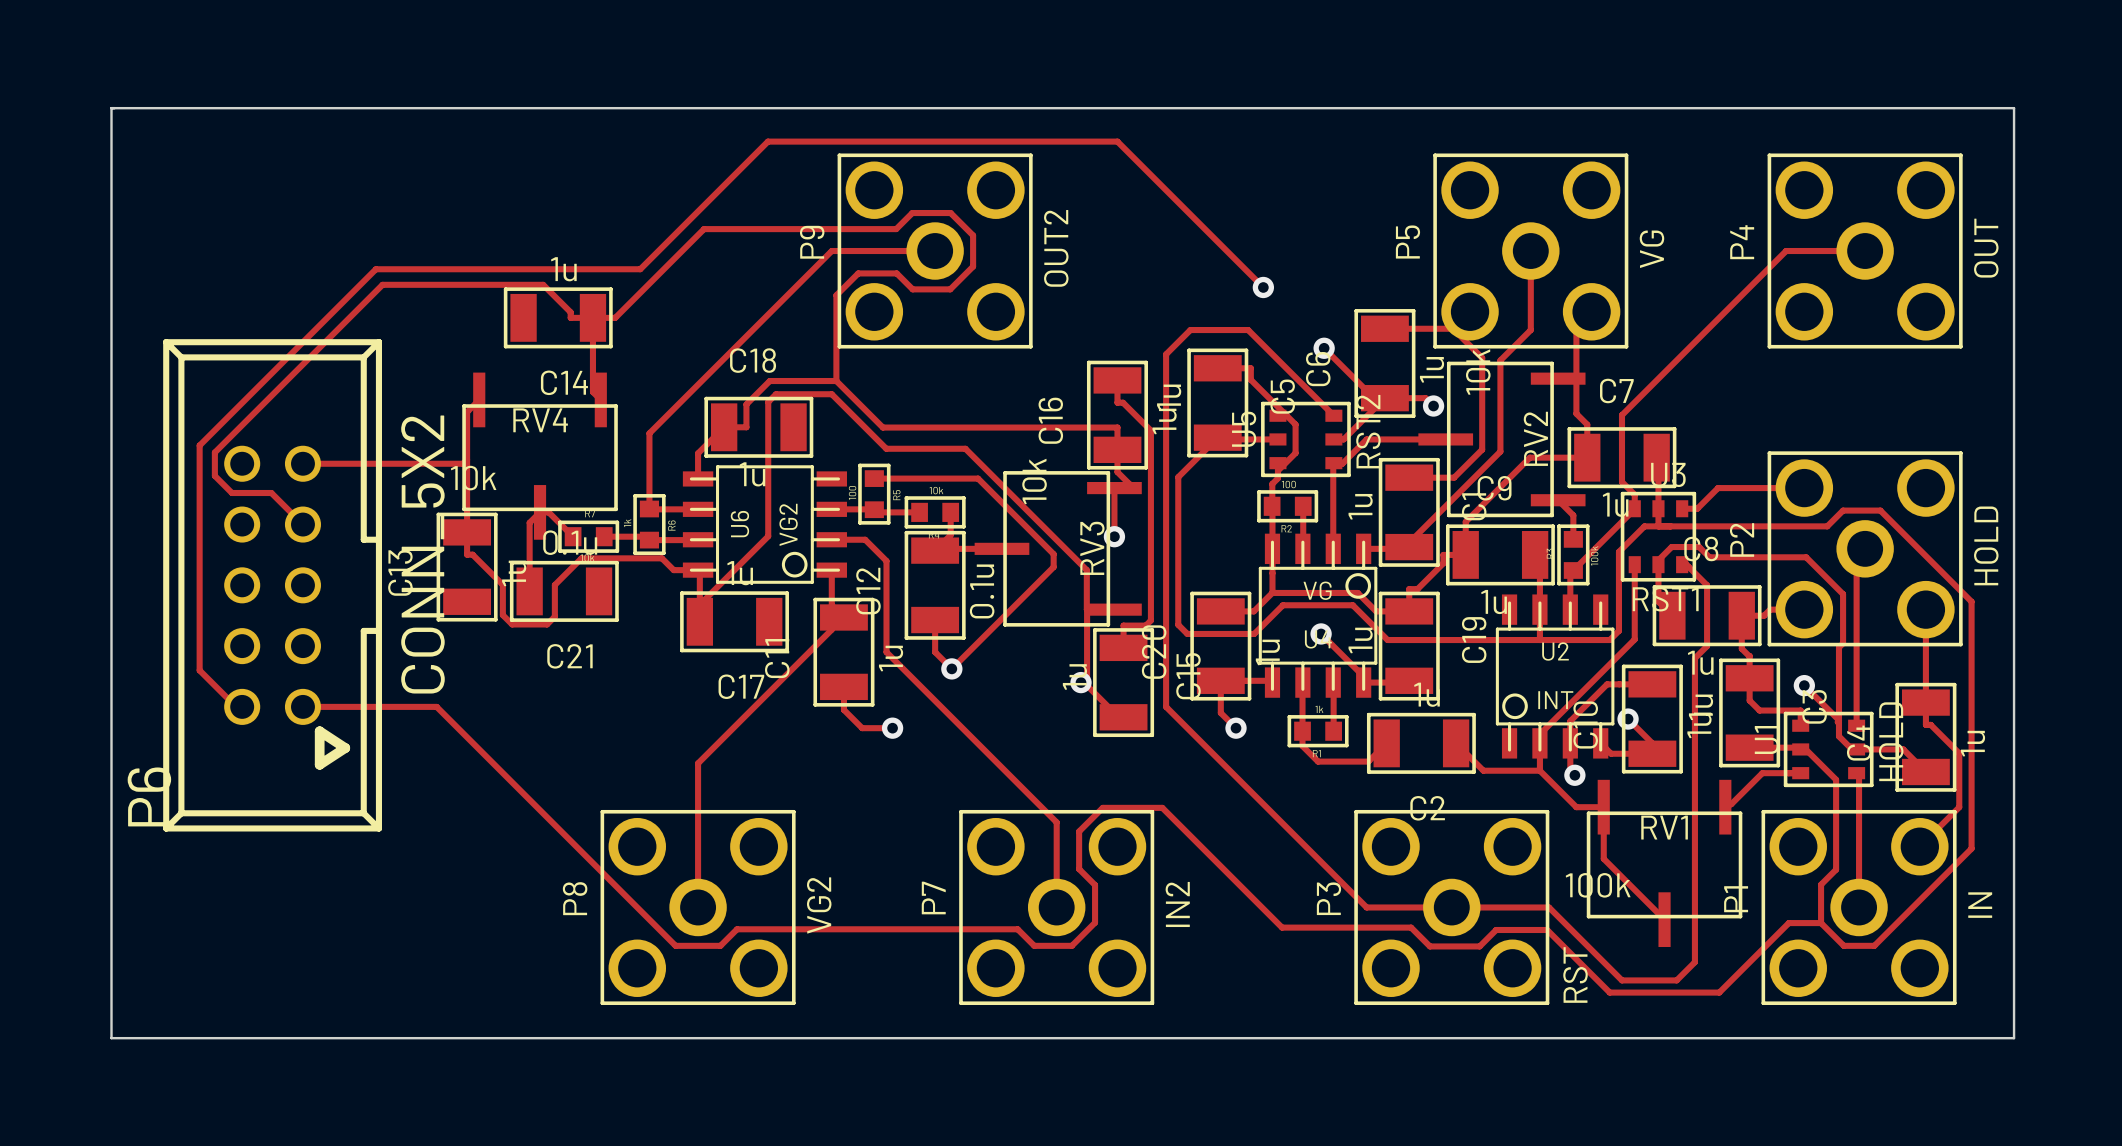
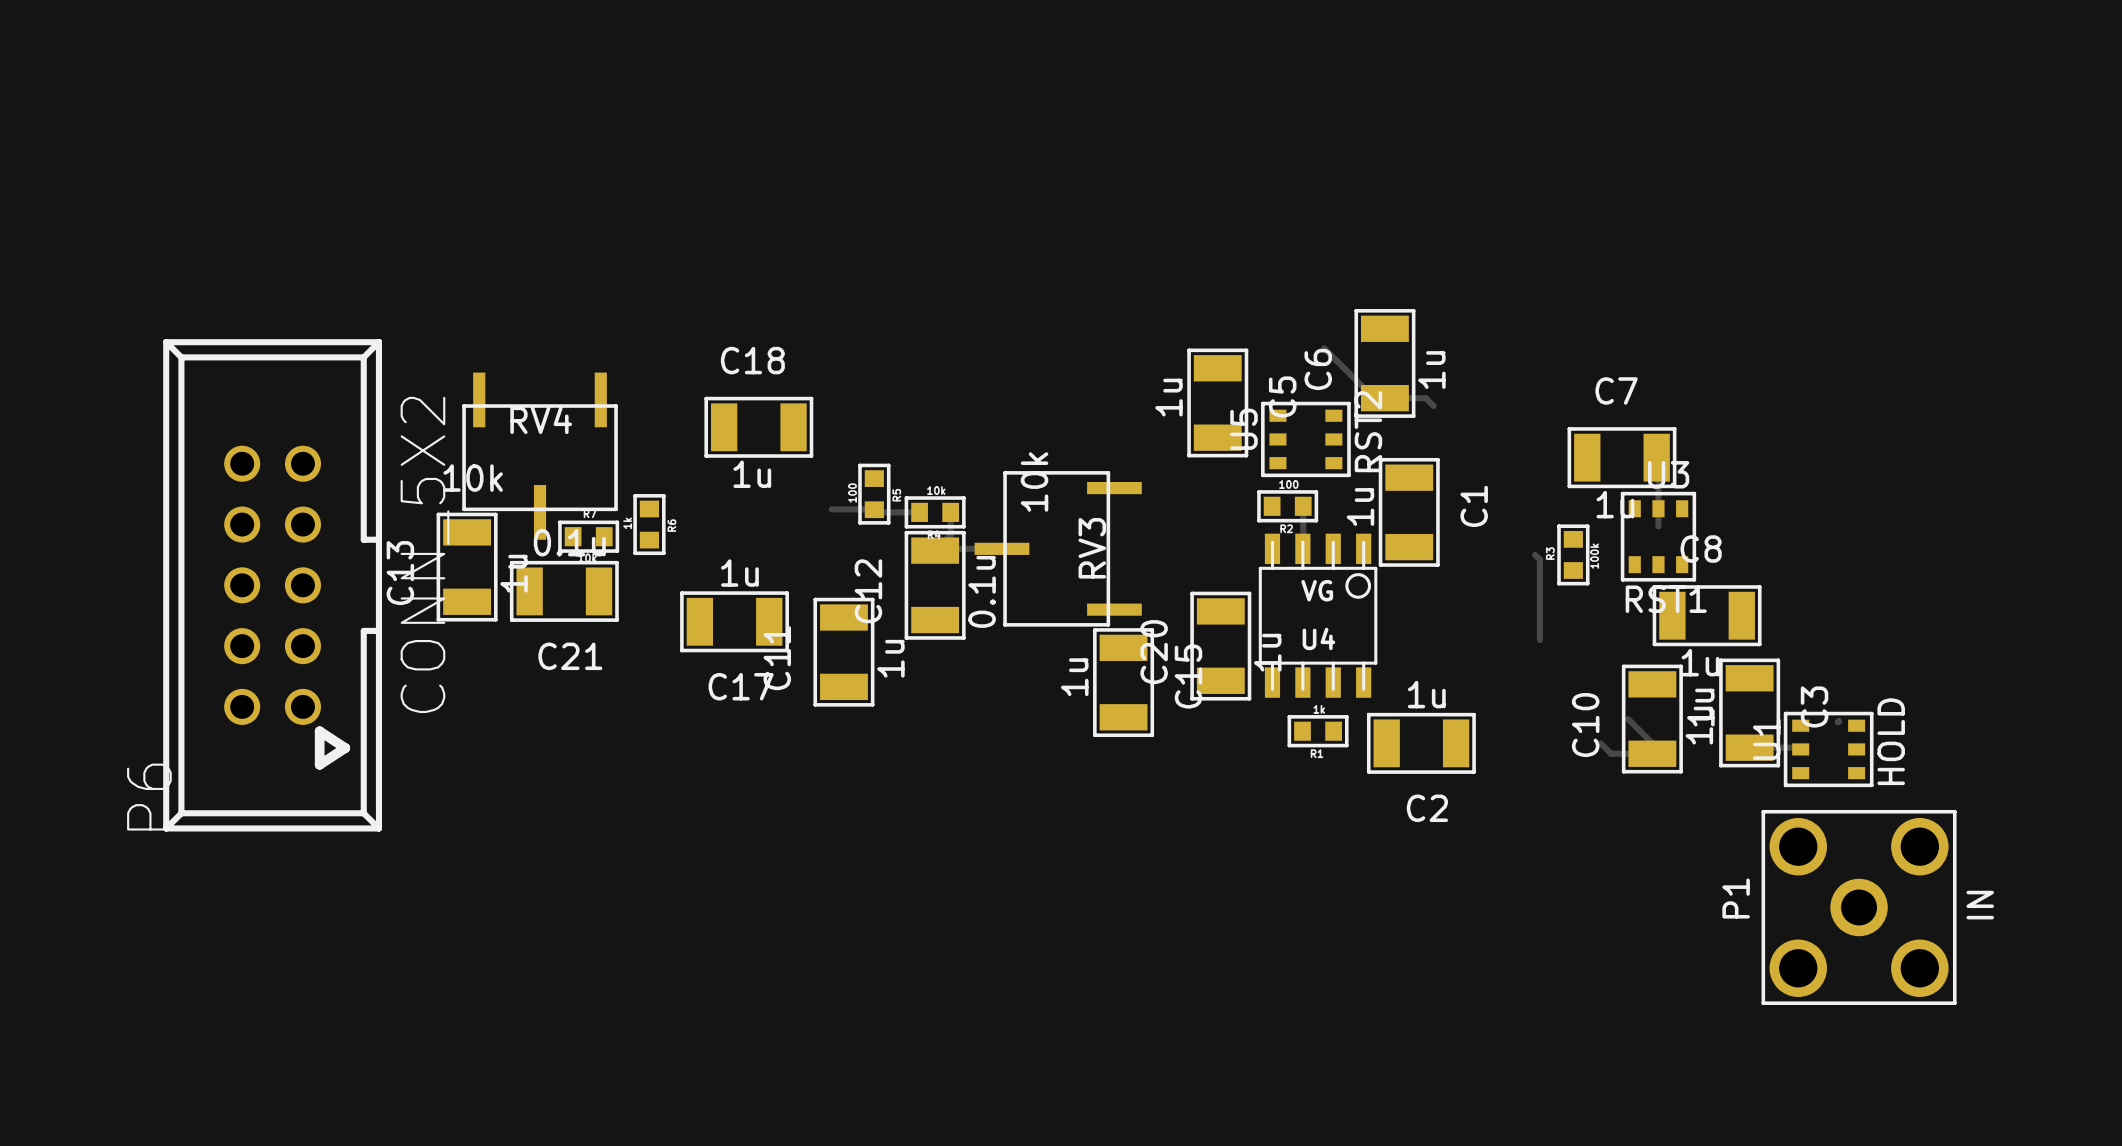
board edge: (111, 108) (2014, 108) (2014, 1038) (111, 1038) (111, 108) -> none
track: (935, 251) (831, 251) (649, 433) (649, 508) (698, 509) -> none
P9: OUT2 (935, 251) -> none
track: (1530, 251) (1530, 330) (1500, 360) (1500, 451) (1409, 542) (1407, 548) (1363, 548) -> none
P5: VG (1530, 251) -> none
track: (1865, 251) (1786, 251) (1621, 415) (1621, 481) (1634, 494) (1634, 509) (1570, 573) (1570, 609) -> none
P4: OUT (1865, 251) -> none
track: (1263, 287) (1117, 141) (767, 141) (640, 269) (375, 269) (199, 445) (199, 670) (236, 706) (242, 706) -> none
via: (1263, 287) -> none
track: (1591, 311) (1576, 326) (1576, 413) (1587, 424) (1587, 457) (1529, 457) (1465, 521) (1465, 554) (1443, 554) (1443, 563) (1417, 589) (1409, 589) (1409, 611) (1376, 611) (1357, 592) (1272, 592) (1253, 611) (1220, 611) -> none
C14: 1u (558, 317) -> none
track: (592, 317) (592, 392) (600, 399) -> none
track: (1384, 328) (1453, 328) -> none
track: (1453, 328) (1482, 357) (1482, 449) (1454, 477) (1409, 477) -> none
via: (1324, 348) -> none
track: (1217, 368) (1250, 368) (1250, 379) (1295, 424) (1295, 453) (1277, 470) -> none
track: (1117, 380) (1117, 402) (1123, 402) (1150, 430) (1150, 620) (1145, 625) (1123, 625) (1123, 647) -> none
track: (836, 381) (769, 381) (746, 404) (746, 427) (724, 427) (698, 453) (698, 478) -> none
track: (836, 381) (836, 295) (858, 273) (896, 273) (912, 289) (950, 289) (973, 266) (973, 235) (950, 213) (912, 213) (896, 229) (704, 229) (615, 317) (570, 317) (570, 312) (543, 284) (382, 284) (214, 452) (214, 475) (231, 493) (271, 493) (302, 524) -> none
track: (836, 381) (882, 427) (1117, 427) (1117, 472) (1129, 483) (1129, 488) (1114, 488) (1114, 536) -> none
track: (1384, 398) (1343, 439) (1333, 439) -> none
track: (479, 399) (467, 412) (467, 554) (472, 554) (502, 584) (502, 615) (512, 624) (547, 624) (554, 616) (554, 585) (581, 558) (661, 558) (673, 570) (698, 570) (699, 571) (699, 621) -> none
via: (1433, 406) -> none
C16: 1u (1117, 415) -> none
track: (1333, 415) (1248, 330) (1190, 330) (1166, 354) (1166, 706) (1366, 907) (1549, 907) (1621, 980) (1676, 980) (1694, 962) (1694, 658) (1707, 646) (1707, 585) (1686, 564) (1682, 564) -> none
track: (1277, 439) (1219, 439) (1217, 437) (1178, 477) (1178, 624) (1187, 633) (1254, 633) (1282, 605) (1352, 605) (1387, 640) (1609, 640) (1618, 630) (1618, 551) (1644, 526) (1827, 526) (1843, 510) (1880, 510) (1971, 601) (1971, 848) (1874, 945) (1843, 945) (1821, 923) -> none
track: (1445, 439) (1366, 439) (1342, 463) (1333, 463) (1333, 548) -> none
RV2: 10k (1501, 439) -> none
track: (467, 459) (463, 463) (302, 463) -> none
track: (1277, 463) (1277, 478) (1272, 484) (1272, 506) -> none
track: (874, 478) (978, 478) (1053, 554) (1053, 567) (951, 668) (935, 652) (935, 620) -> none
track: (1804, 488) (1718, 488) (1697, 508) (1682, 508) -> none
track: (1558, 500) (1573, 515) (1573, 539) -> none
track: (1272, 506) (1272, 592) -> none
U6: VG2 (764, 524) -> none
track: (573, 536) (548, 512) (540, 512) (529, 522) (529, 591) -> none
track: (604, 536) (646, 536) (649, 540) (698, 539) -> none
via: (1114, 536) -> none
track: (831, 539) (865, 539) (886, 561) (886, 652) (1056, 822) (1056, 907) -> none
track: (1865, 548) (1856, 557) (1856, 725) -> none
P2: HOLD (1865, 548) -> none
C9: 1u (1500, 554) -> none
track: (1634, 564) (1634, 639) (1539, 734) (1539, 770) -> none
track: (831, 570) (831, 629) (698, 763) (698, 907) -> none
track: (699, 600) (704, 600) (768, 536) (768, 402) (776, 394) (831, 394) (886, 448) (965, 448) (1086, 570) (1086, 609) (1114, 609) -> none
track: (1087, 609) (1087, 685) (1118, 717) (1123, 717) -> none
track: (1804, 609) (1770, 609) (1764, 615) (1741, 615) (1741, 648) (1749, 655) (1749, 700) (1759, 710) (1800, 710) (1800, 725) -> none
track: (1925, 609) (1925, 724) (1930, 724) (1959, 753) (1959, 807) (1919, 846) -> none
track: (1672, 615) (1658, 601) (1658, 560) (1671, 547) (1699, 547) (1709, 557) (1806, 557) (1843, 594) (1843, 643) (1838, 647) (1838, 736) (1852, 749) (1903, 749) (1925, 771) -> none
track: (1321, 633) (1363, 676) (1363, 682) (1407, 682) (1409, 680) -> none
via: (1321, 633) -> none
C19: 1u (1409, 646) -> none
via: (951, 668) -> none
U2: INT (1555, 676) -> none
via: (1081, 682) -> none
track: (1272, 682) (1270, 680) (1220, 680) (1220, 712) (1236, 728) -> none
track: (1302, 682) (1302, 746) (1318, 761) (1368, 761) (1386, 743) -> none
track: (1333, 682) (1333, 731) -> none
track: (1652, 684) (1607, 684) (1570, 721) (1570, 770) (1574, 775) -> none
track: (1804, 685) (1838, 720) -> none
via: (1804, 685) -> none
track: (843, 686) (843, 709) (862, 728) (892, 728) -> none
track: (302, 706) (436, 706) (675, 945) (720, 945) (737, 929) (1017, 929) (1034, 945) (1071, 945) (1095, 922) (1095, 885) (1079, 869) (1079, 831) (1102, 807) (1162, 807) (1282, 927) (1411, 927) (1429, 946) (1479, 946) (1496, 929) (1547, 929) (1609, 992) (1719, 992) (1788, 923) (1821, 923) -> none
via: (1628, 719) -> none
via: (892, 728) -> none
via: (1236, 728) -> none
C4: 1u (1925, 737) -> none
track: (1456, 743) (1483, 770) (1539, 770) -> none
track: (1800, 749) (1805, 749) (1836, 779) (1836, 869) (1821, 884) (1821, 923) -> none
track: (1539, 770) (1576, 807) (1603, 807) (1603, 858) (1664, 919) -> none
track: (1800, 773) (1762, 773) (1731, 804) (1725, 807) -> none
track: (1857, 774) (1856, 773) (1859, 775) (1859, 907) -> none
via: (1574, 775) -> none
RV1: 100k (1664, 863) -> none
P8: VG2 (698, 907) -> none
P7: IN2 (1056, 907) -> none
P3: RST (1451, 907) -> none

